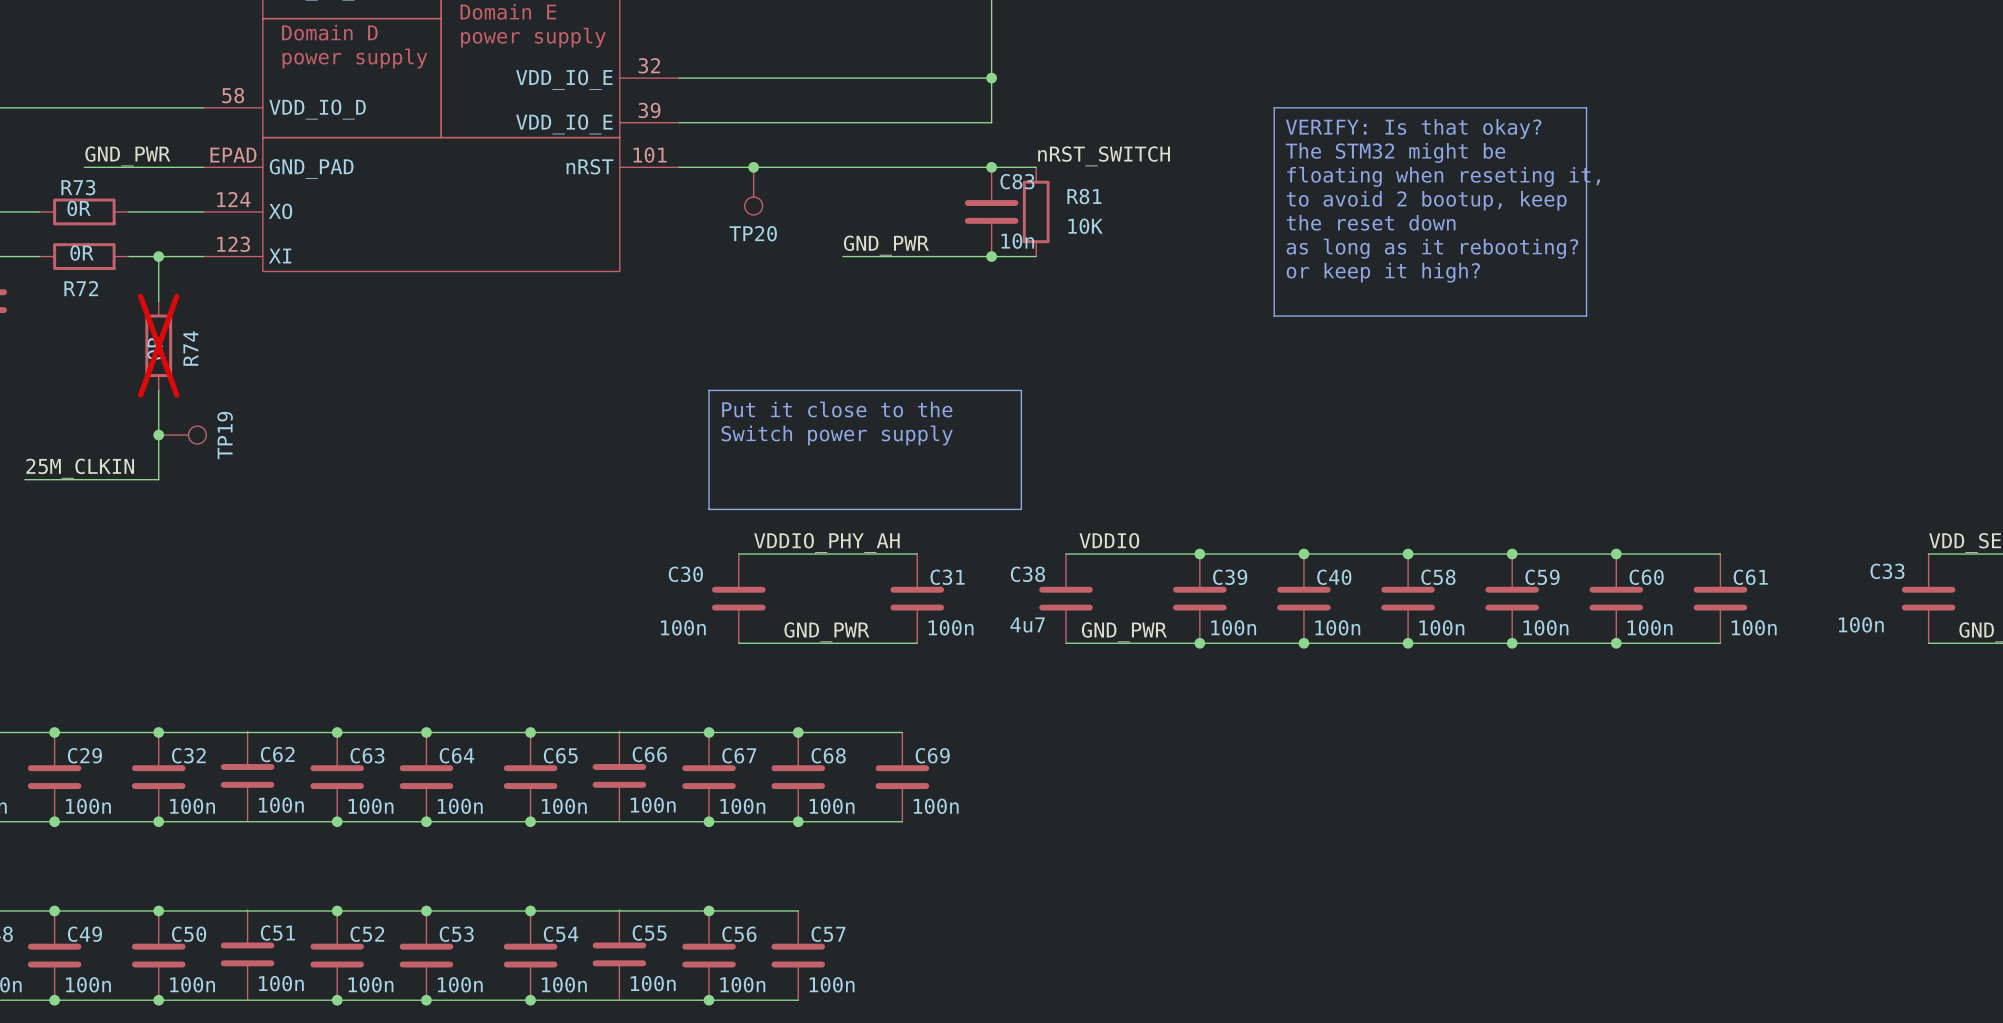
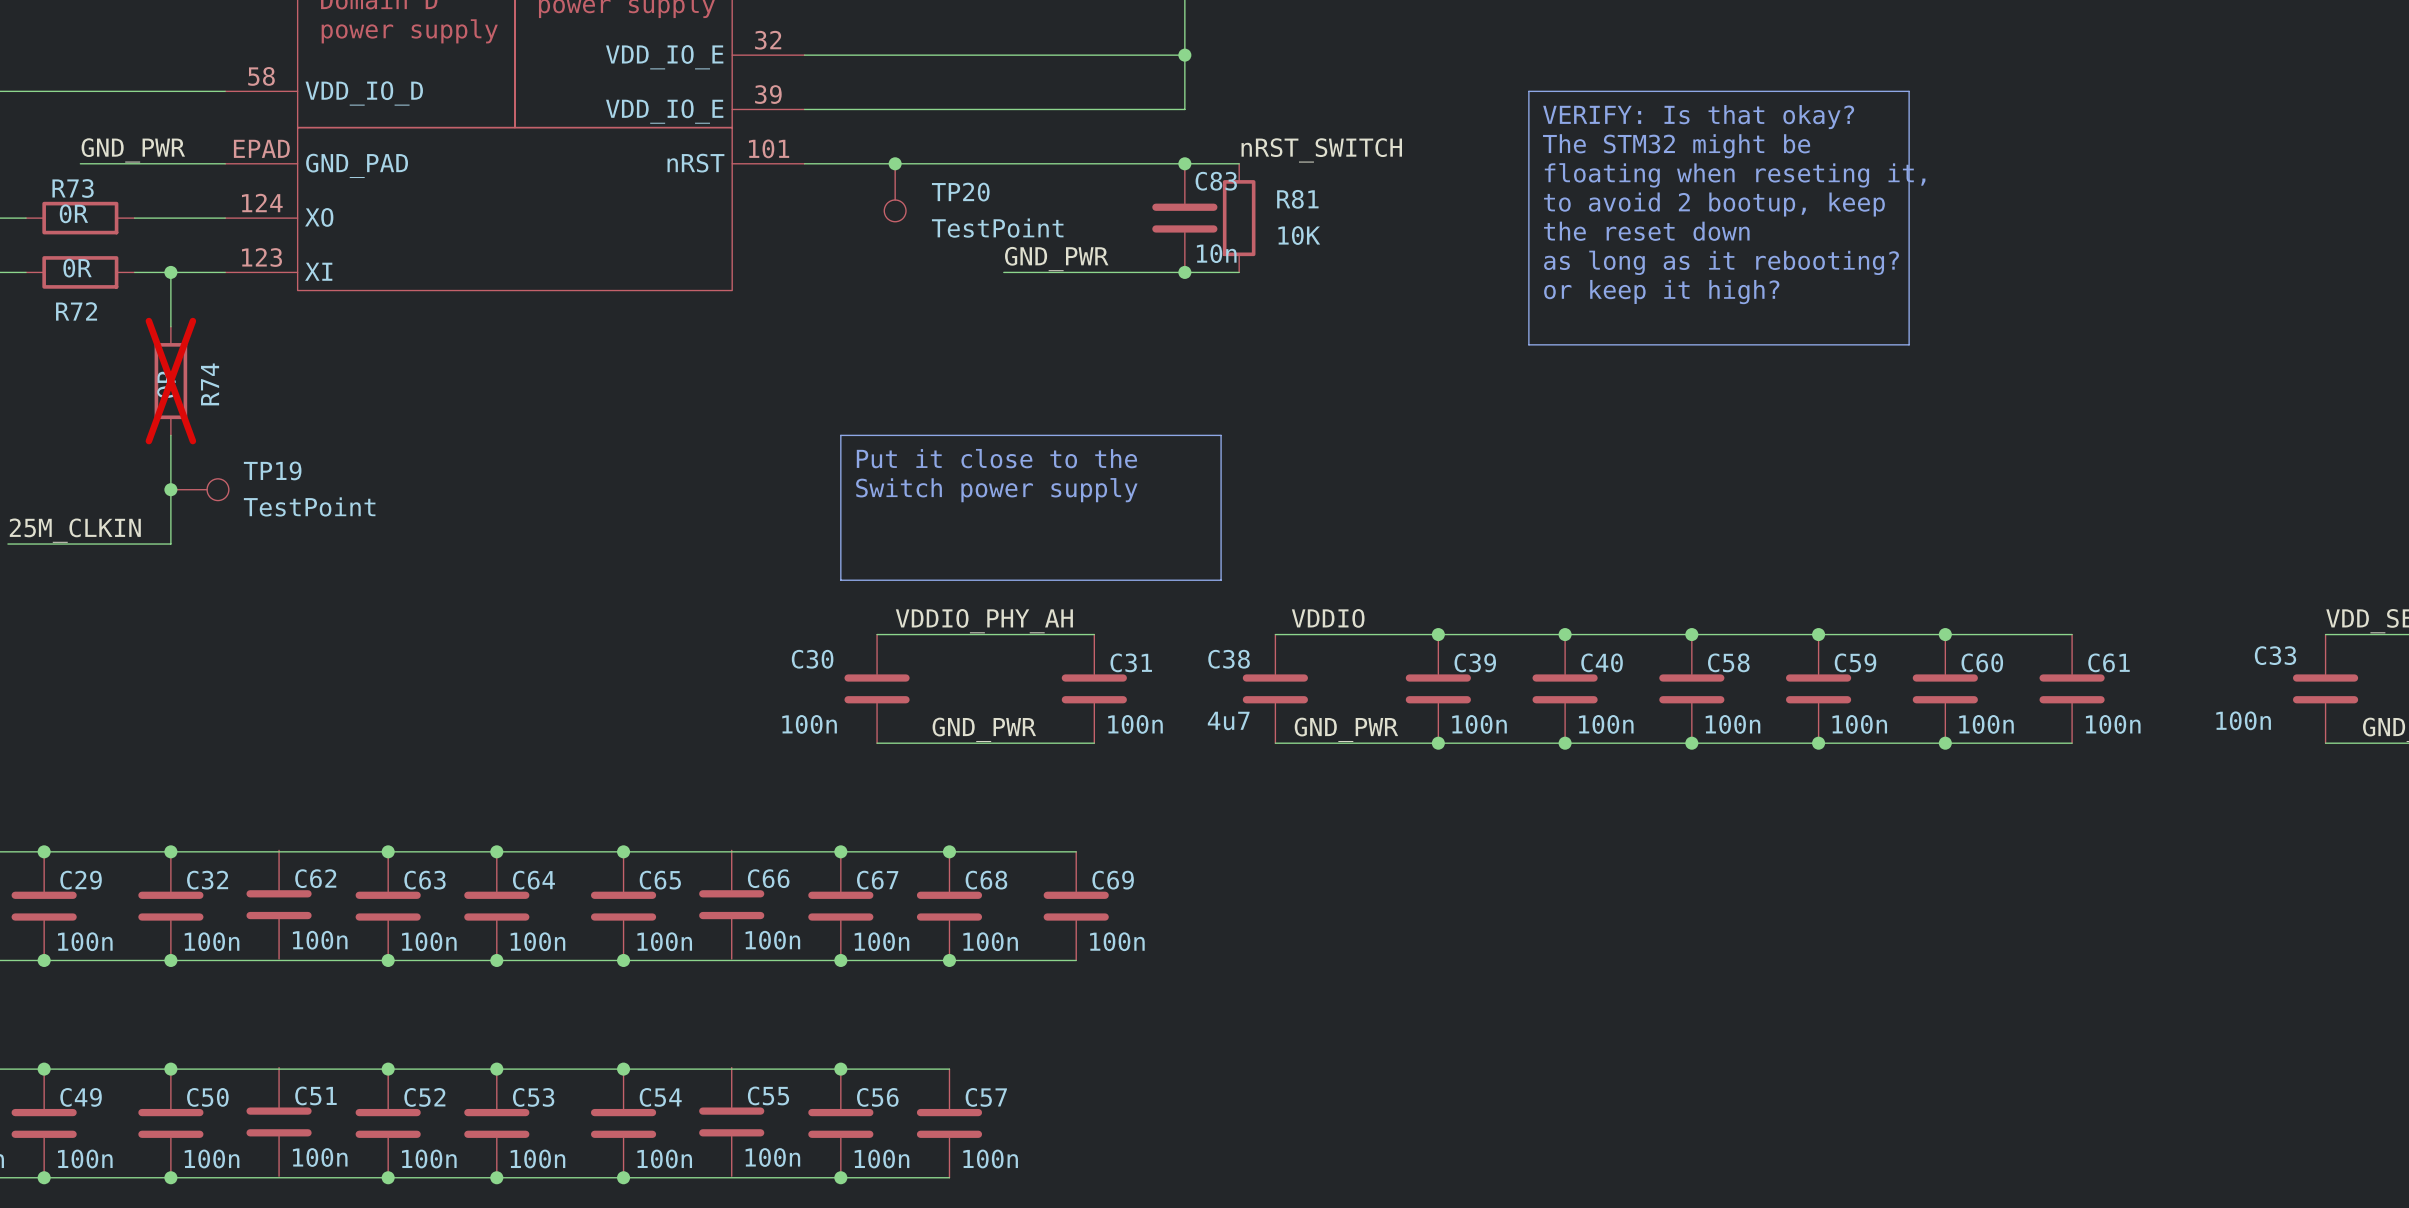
TP20 value: none -> TestPoint (997, 228)
TP20 name position: TP20 (753, 233) -> TP20 (960, 192)
TP19 name rotation: 0° (225, 435) -> 90° clockwise (272, 470)
TP19 value: none -> TestPoint (309, 506)

